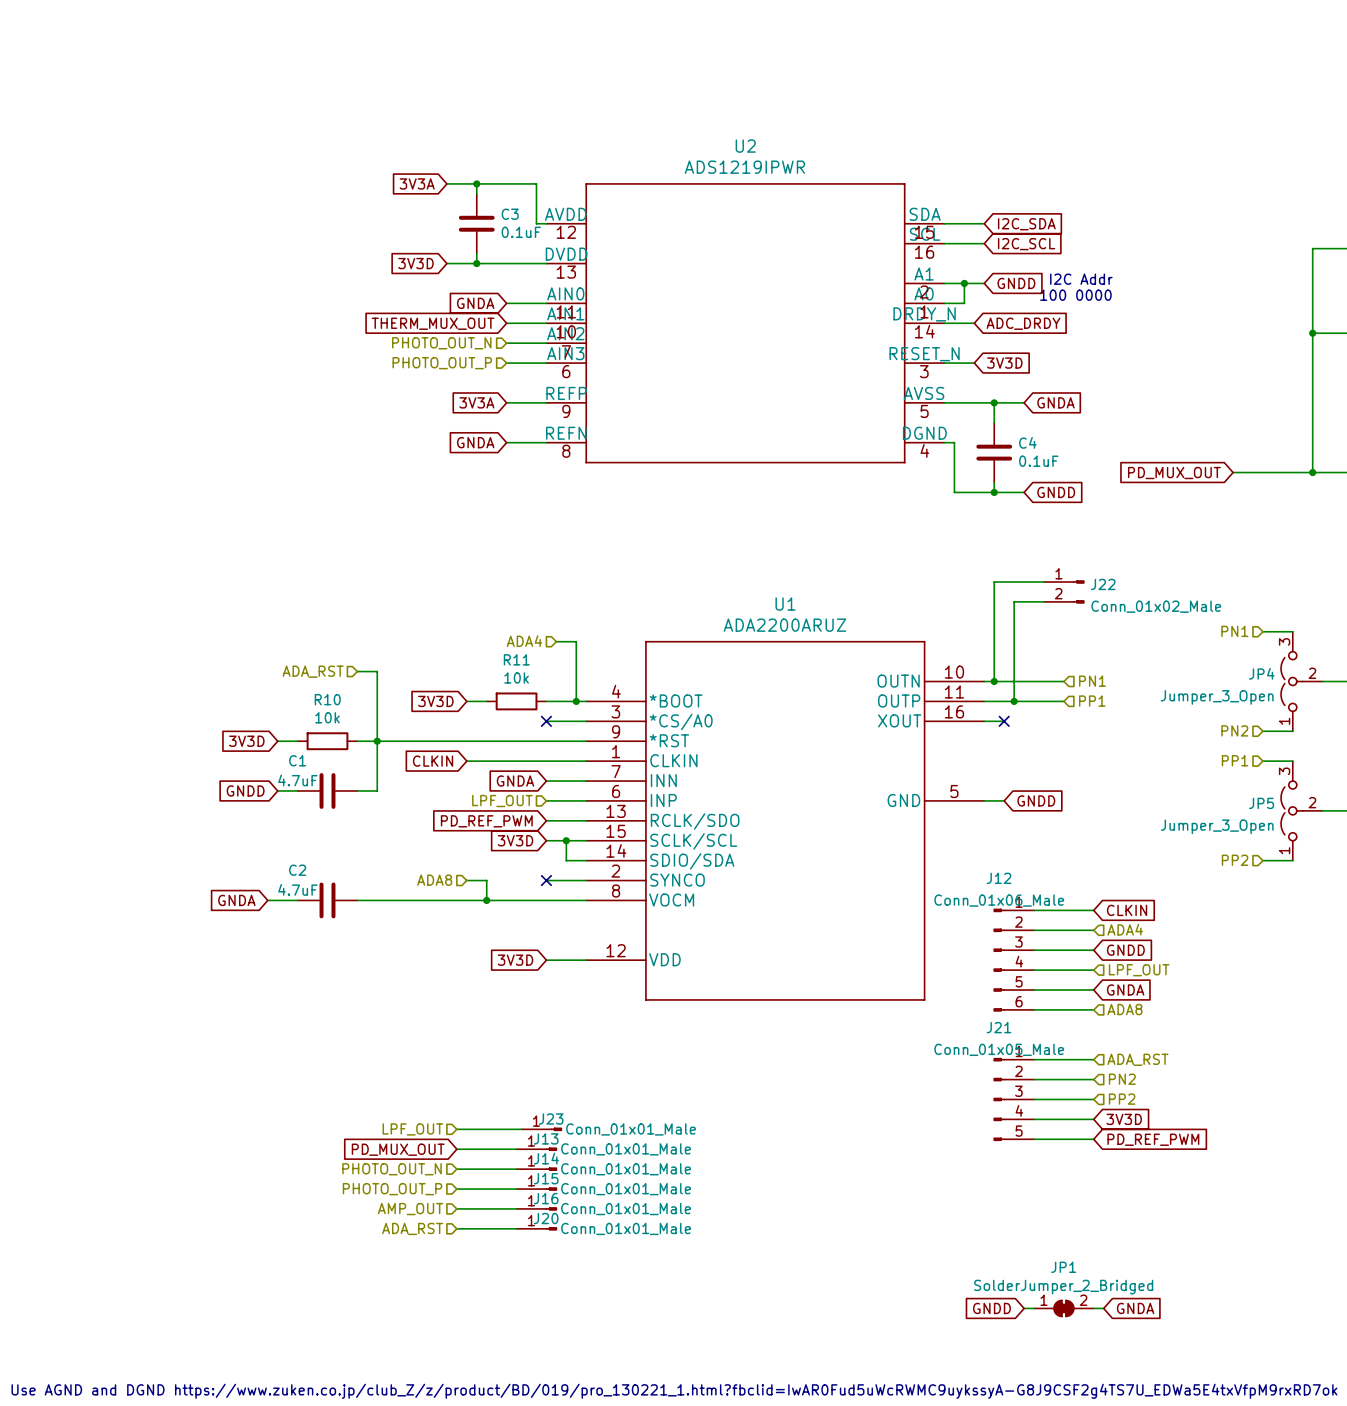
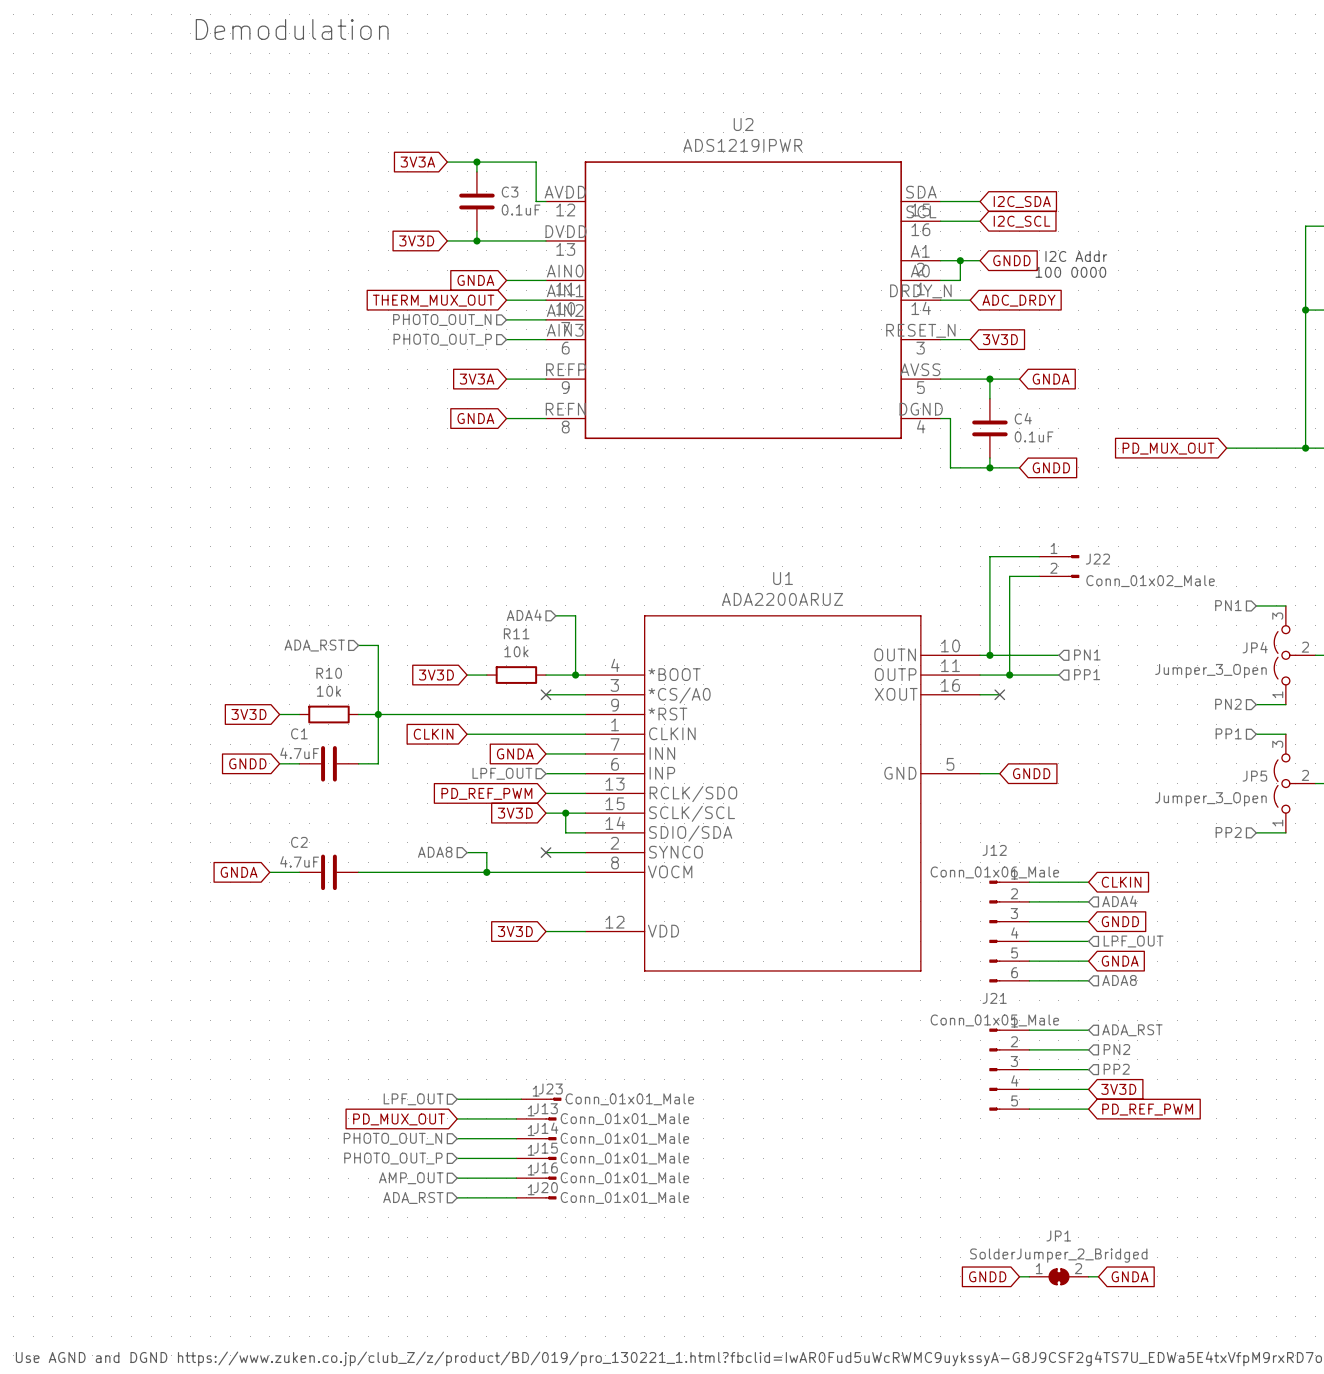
text: none -> Demodulation (292, 29)

